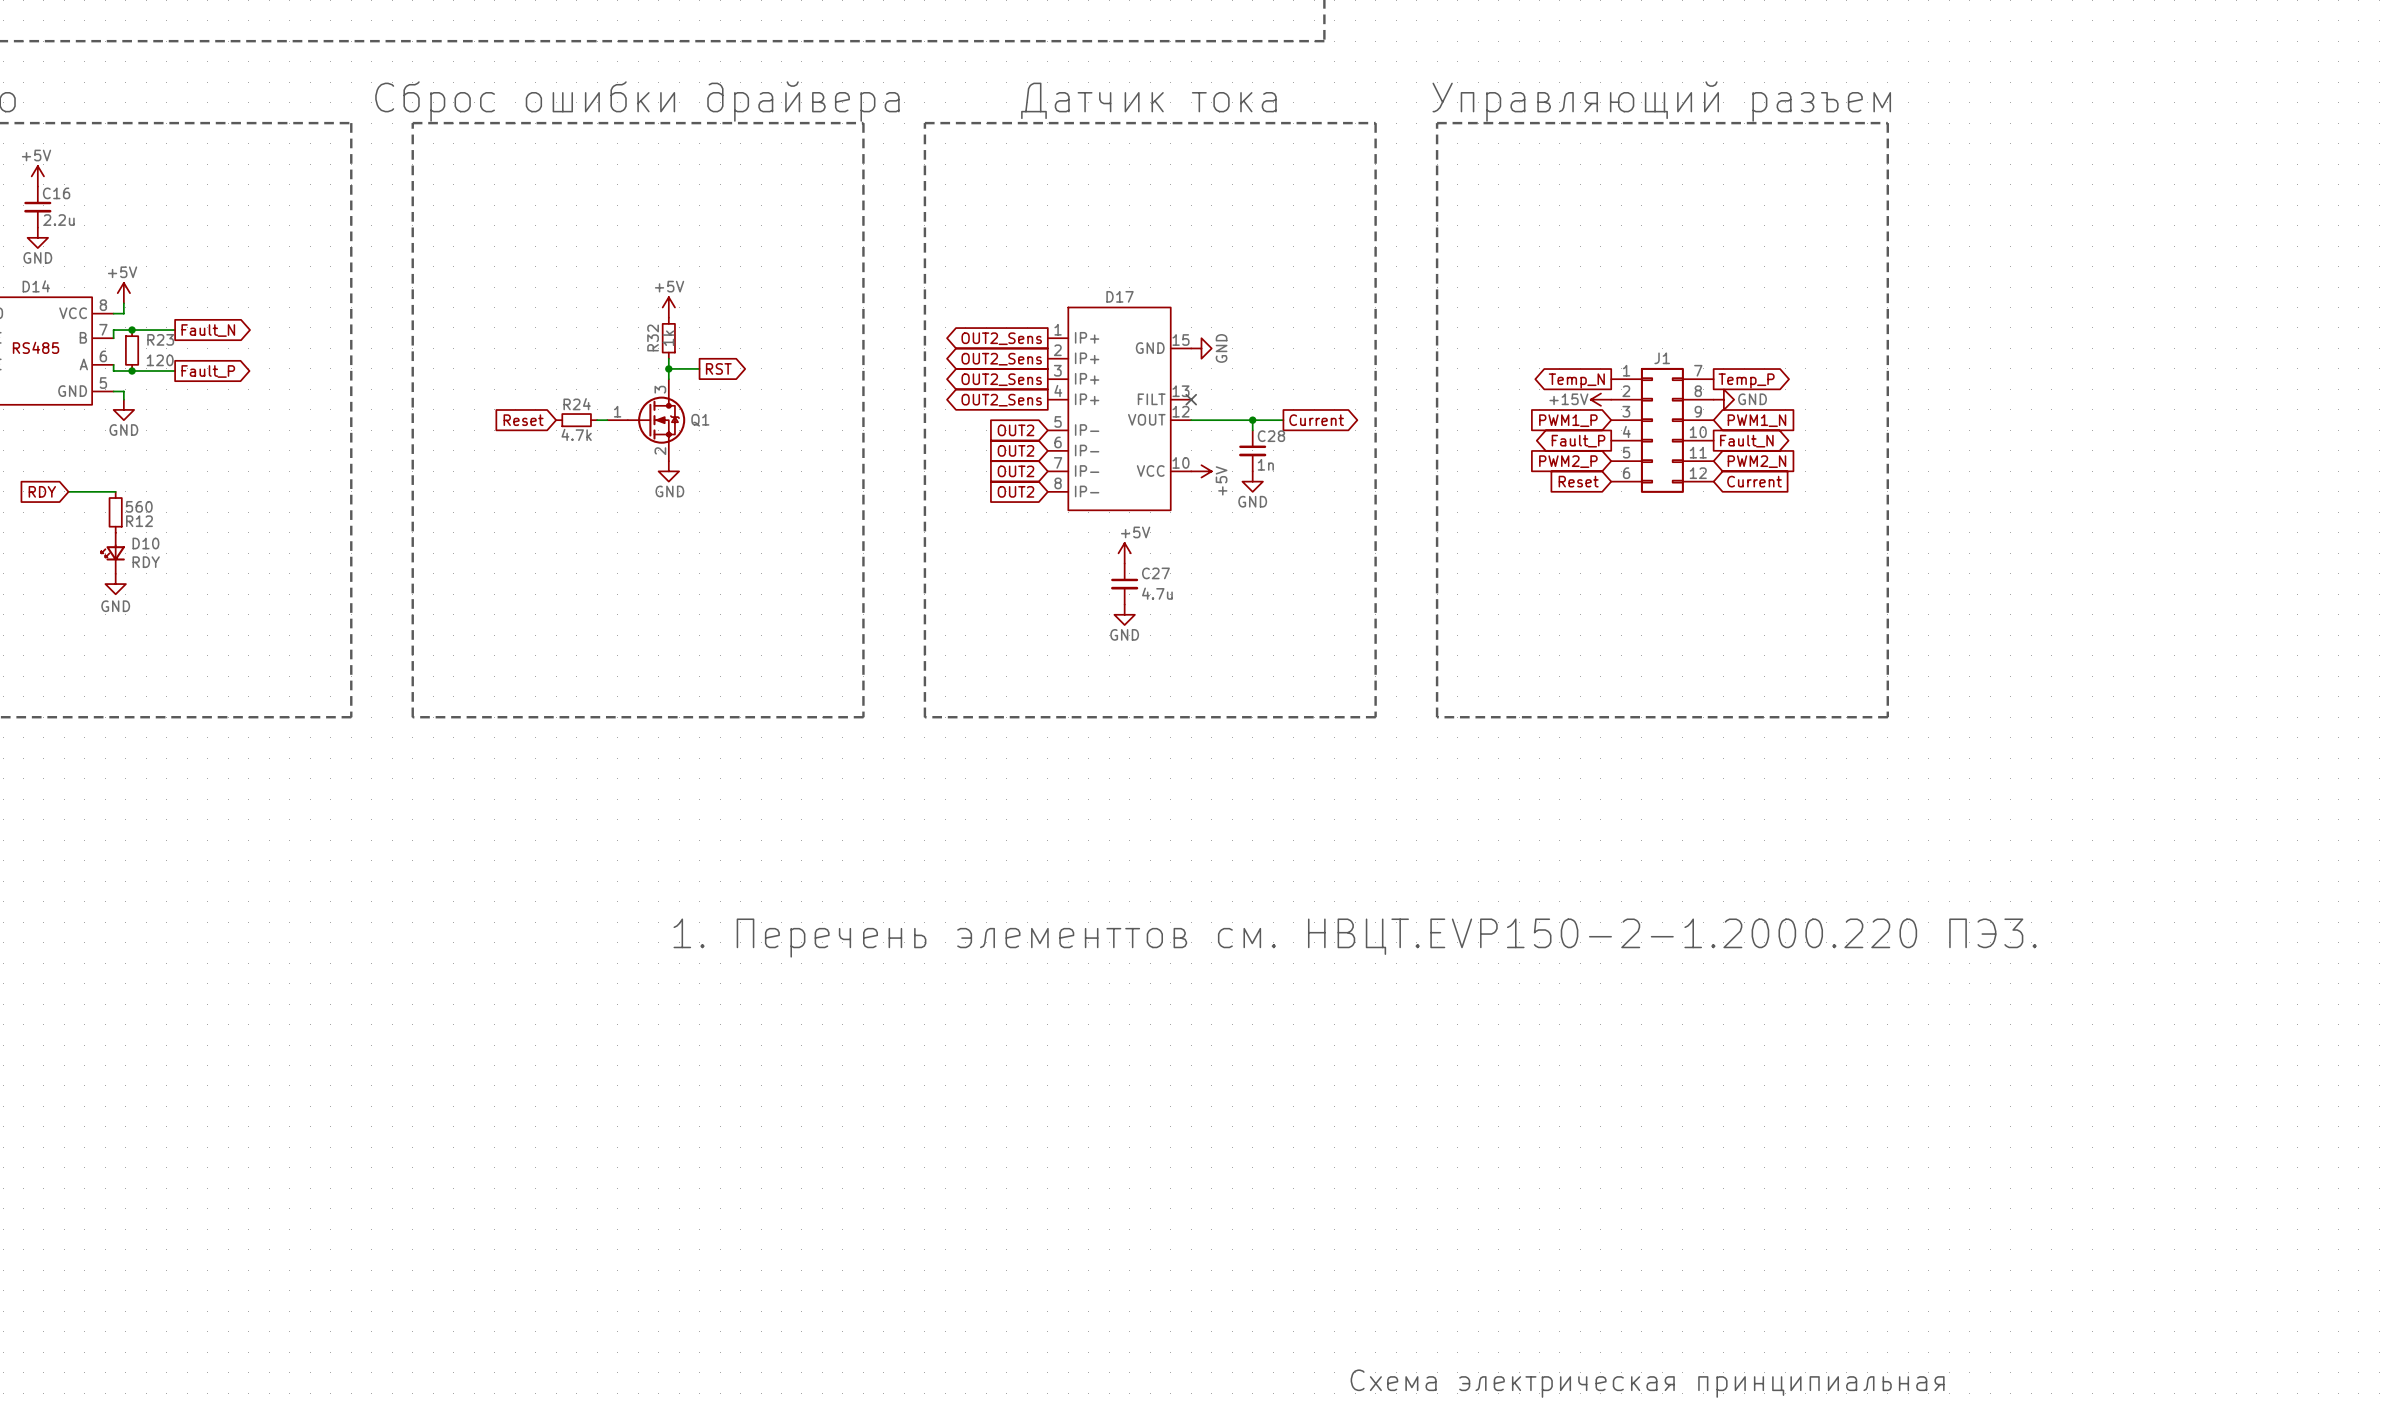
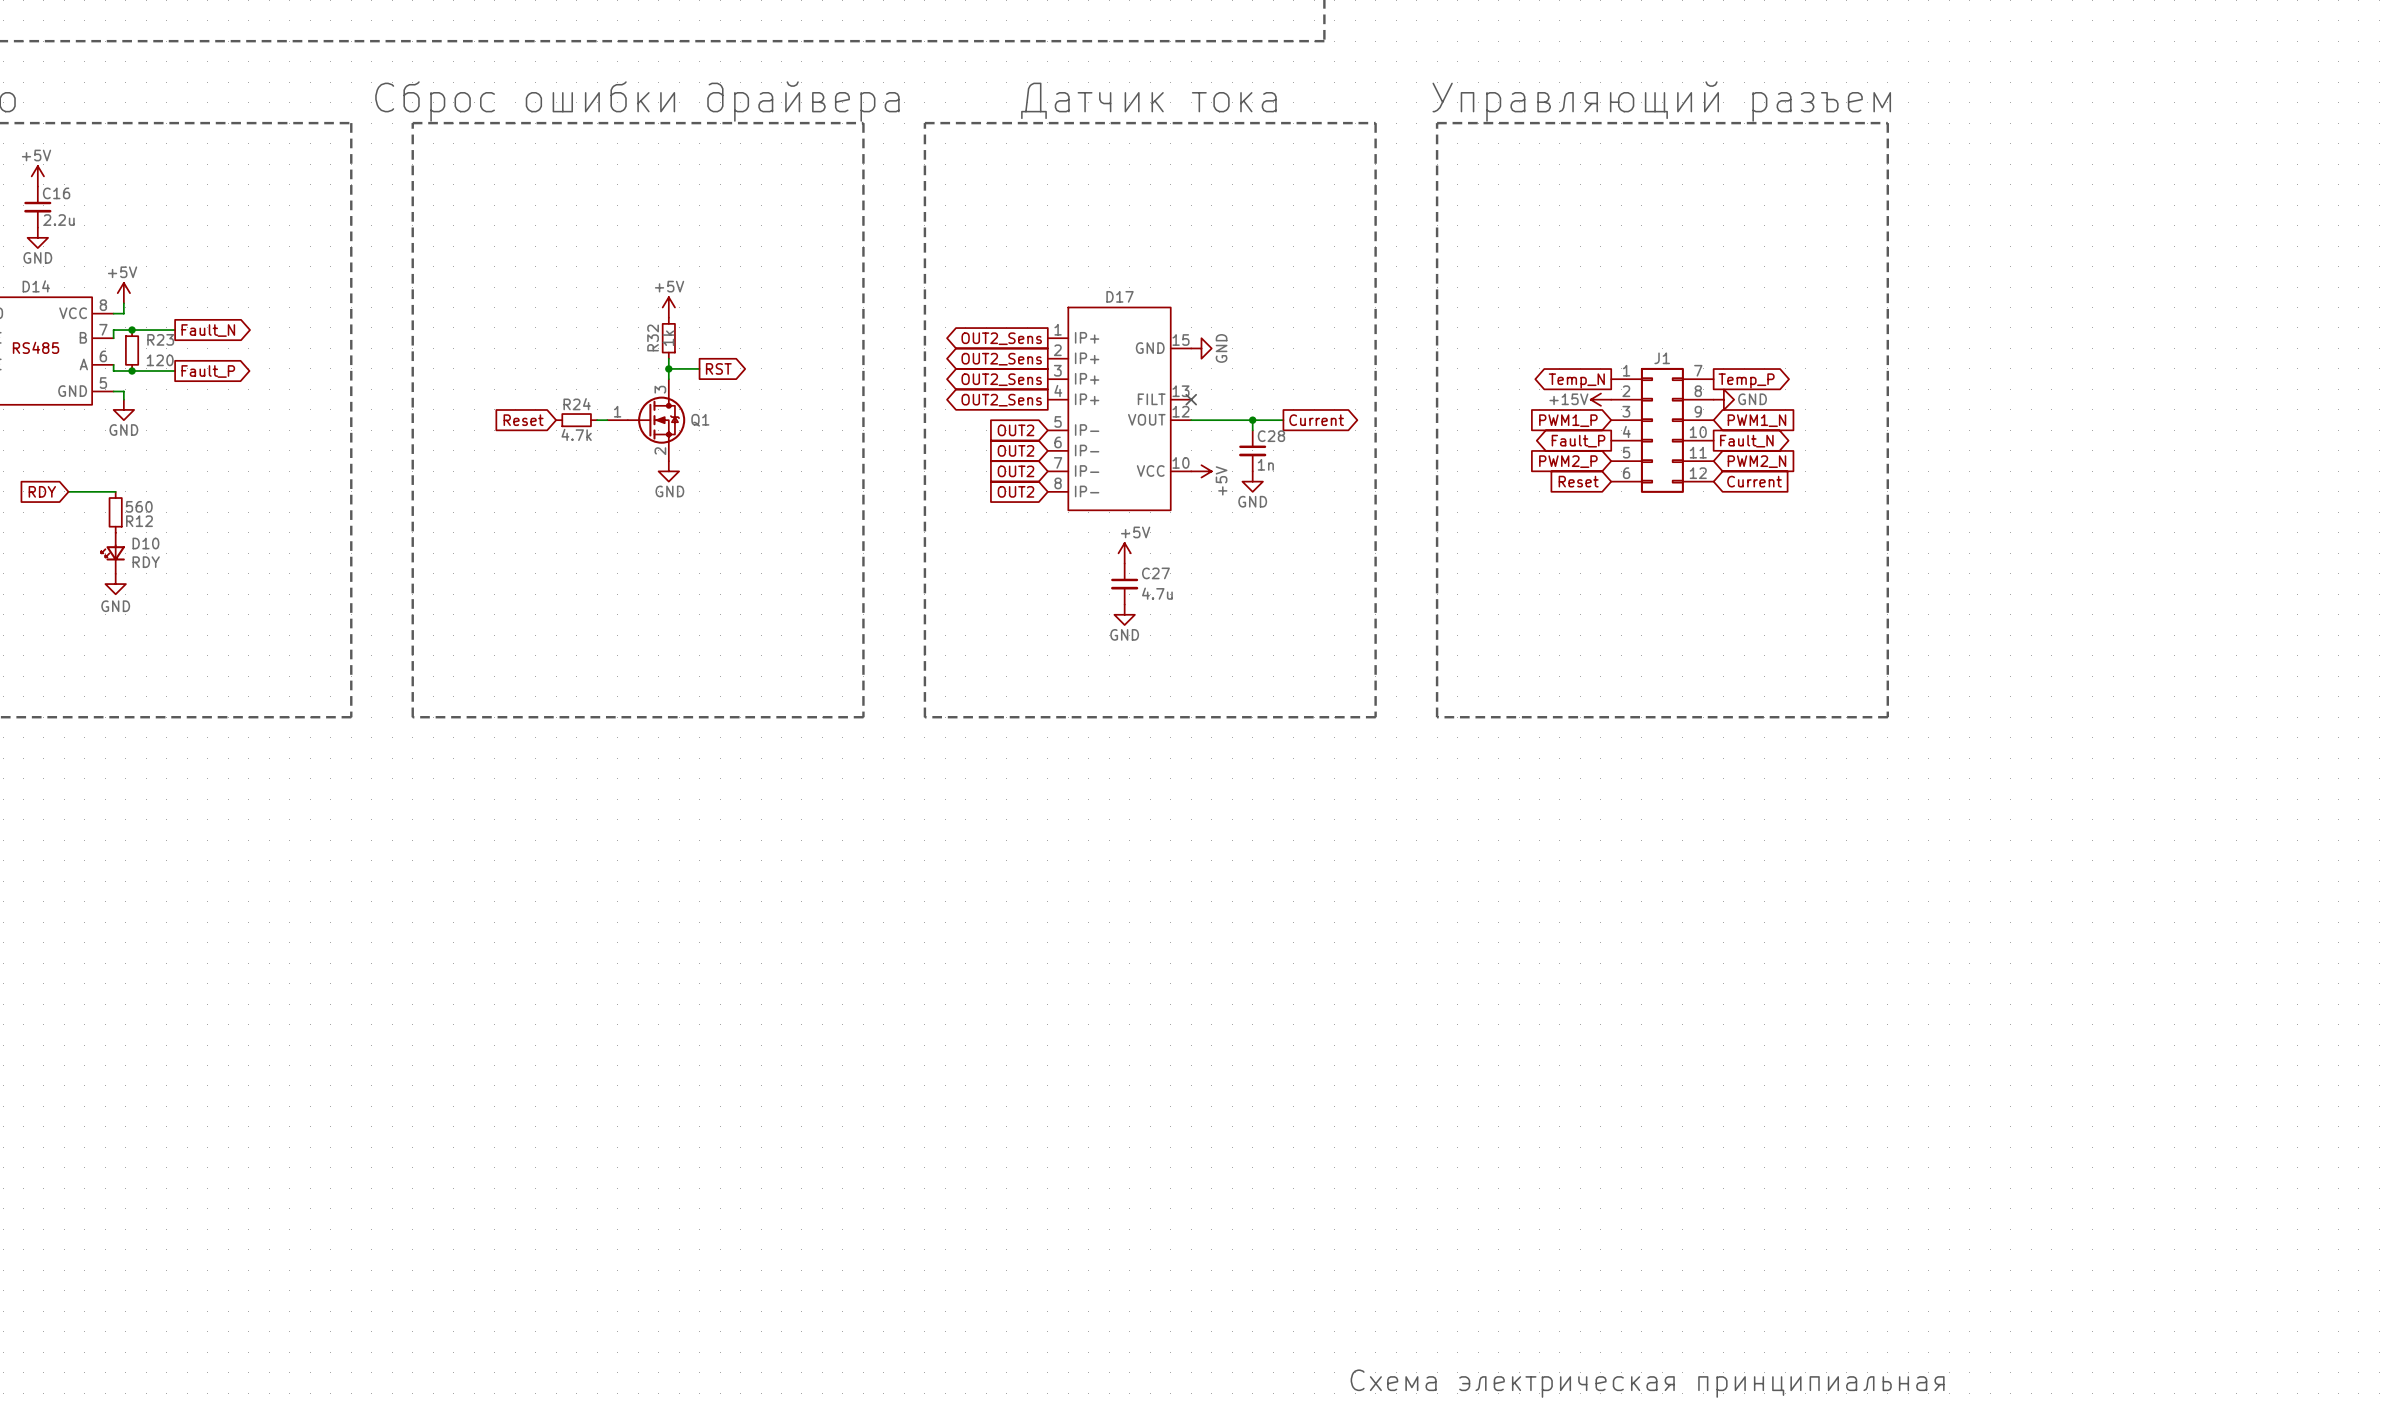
text: 1. Перечень элементтов см. НВЦТ.EVP150-2-1.2000.220 ПЭ3. (1355, 938) -> none

